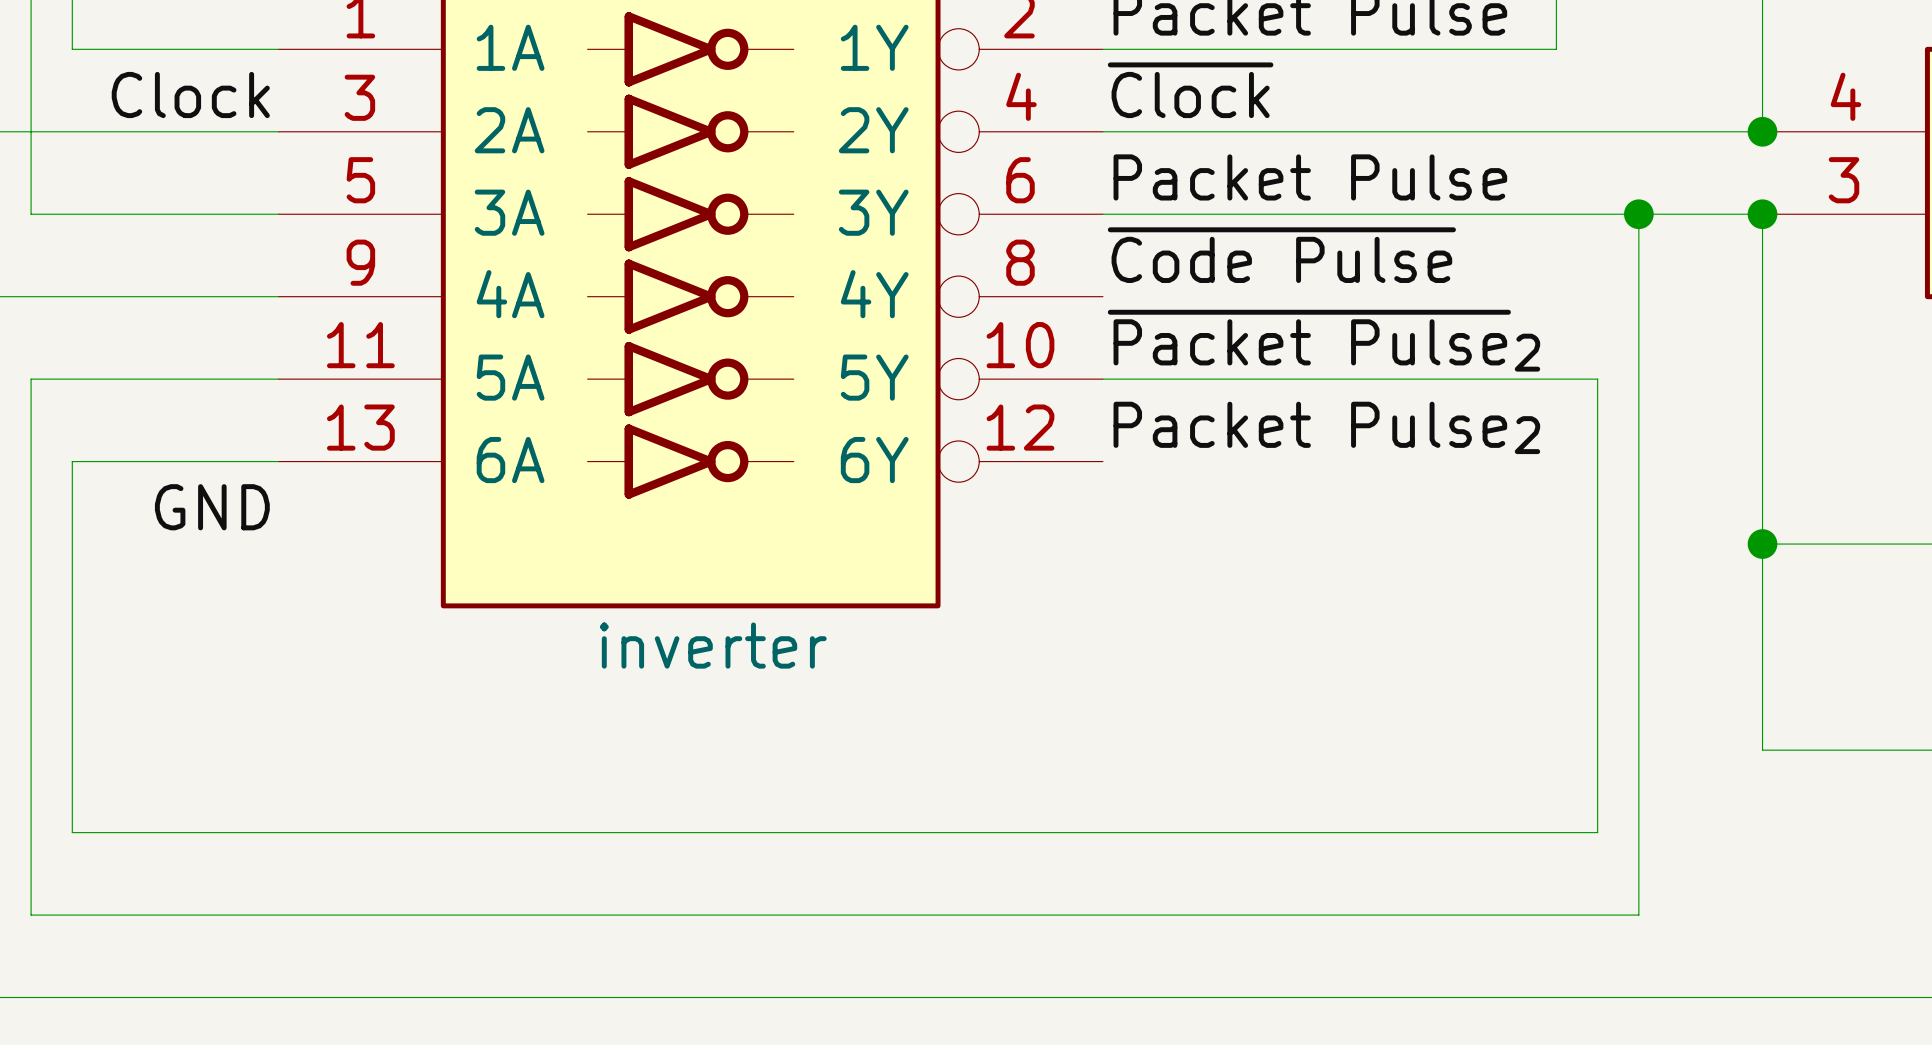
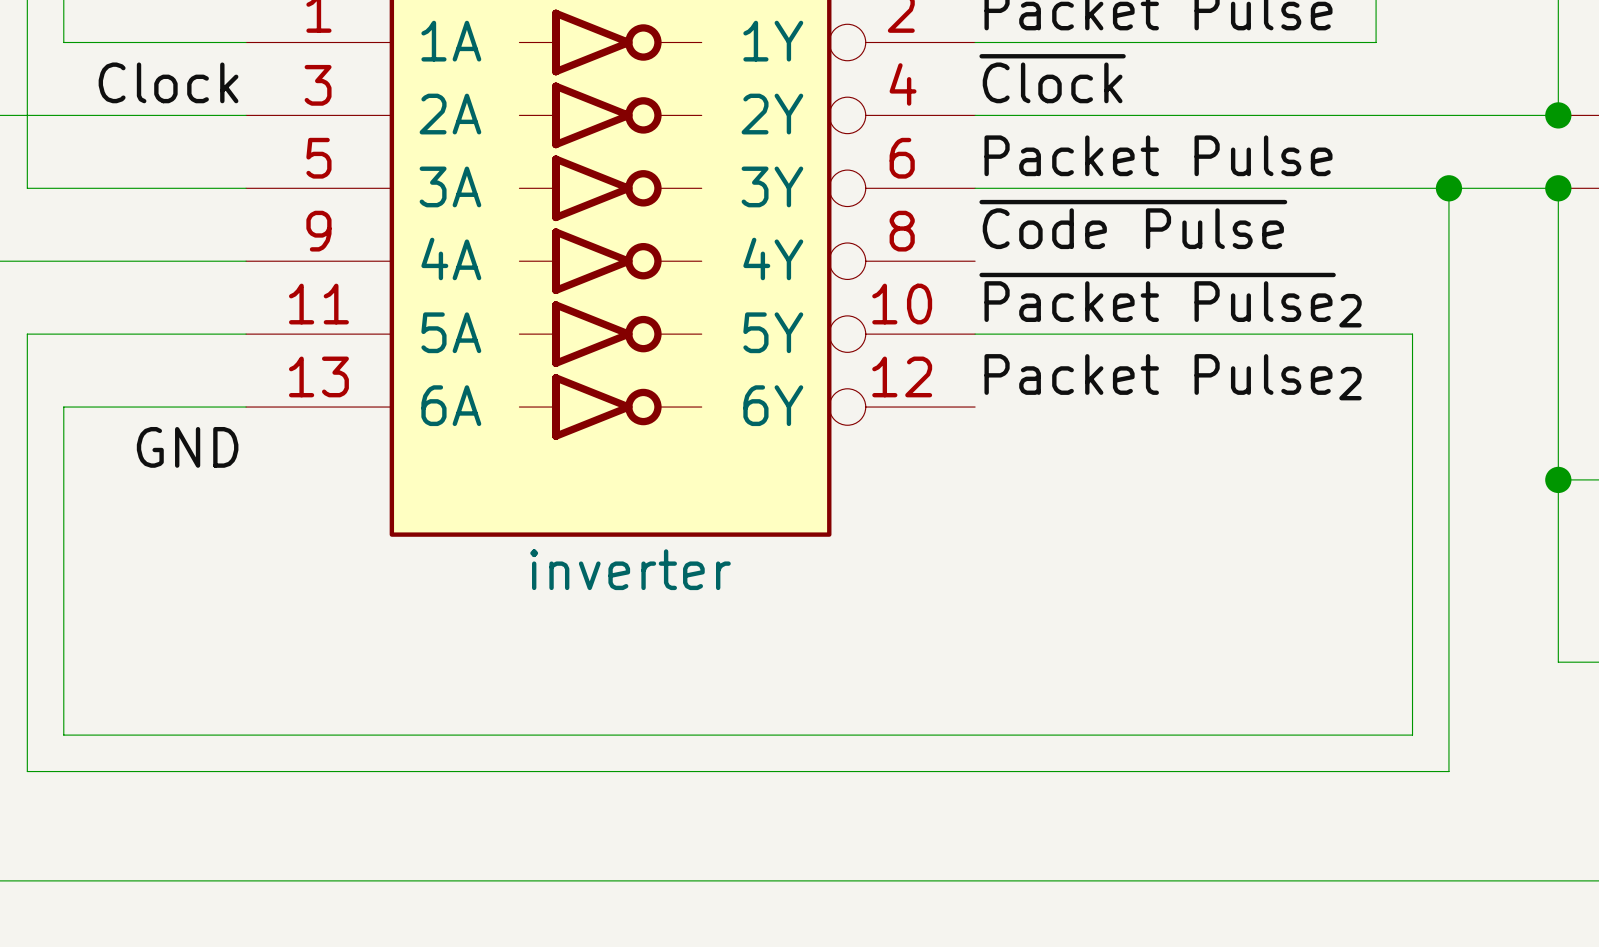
wire: (31, 873) (31, 915) (1638, 915) (1638, 873) -> (27, 771) (1448, 771)

